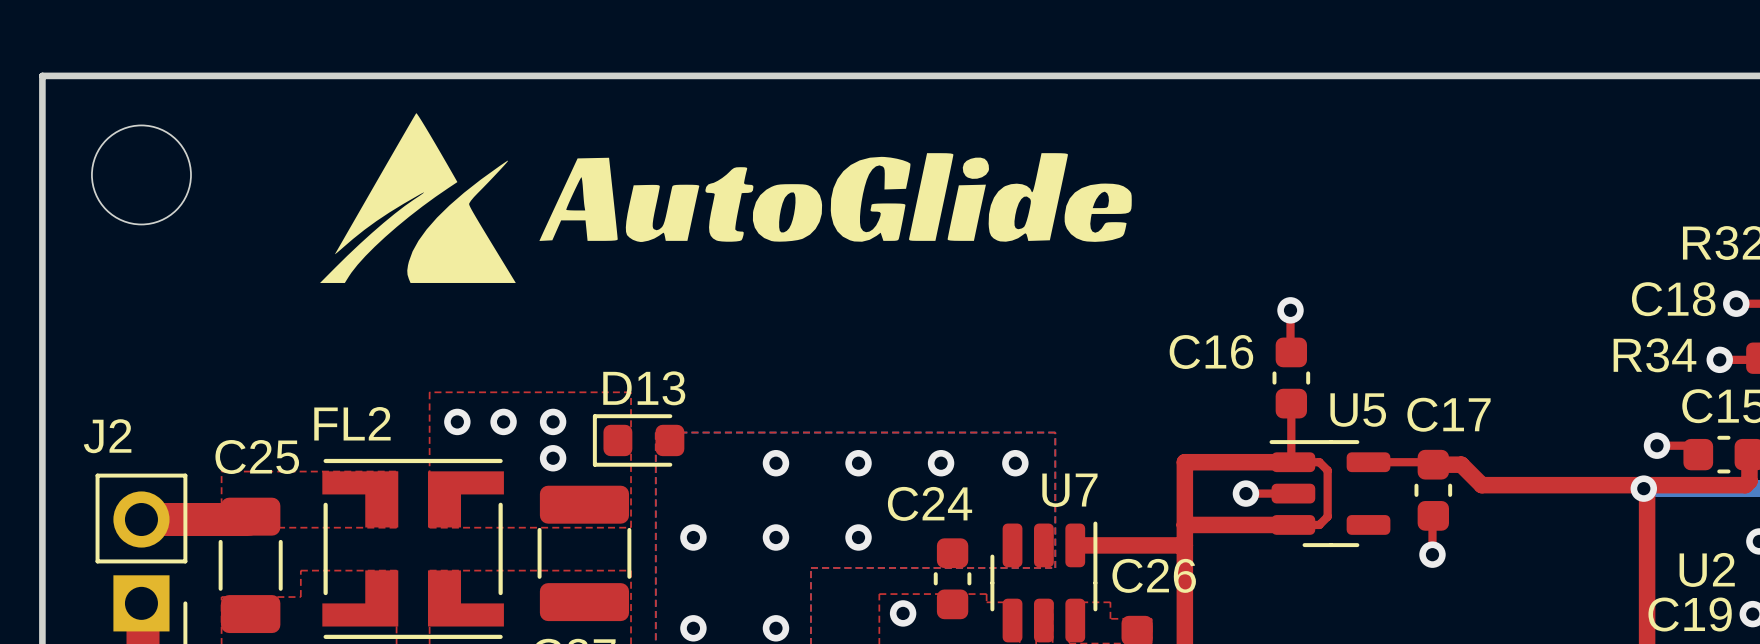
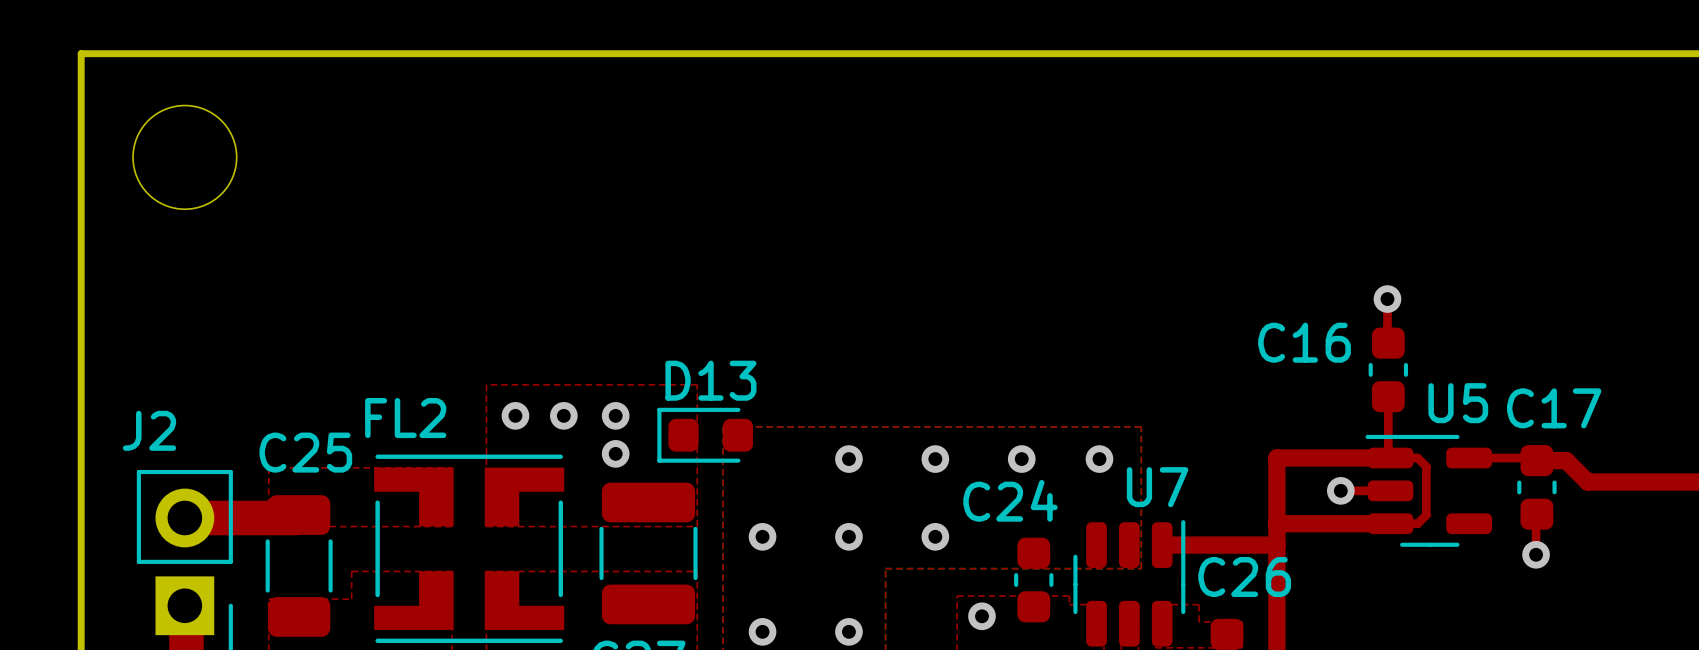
drawing: [320, 113, 1132, 283] -> none

